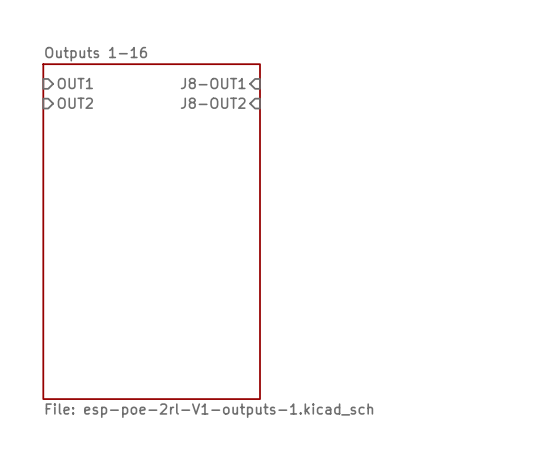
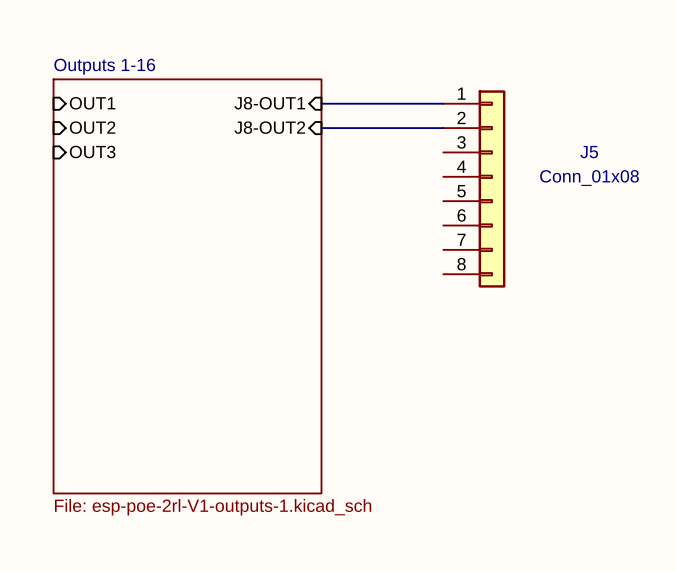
wire: none -> (321, 103) (443, 103)
wire: none -> (321, 128) (443, 128)
sheet pin: none -> OUT3 (92, 151)
J5: none -> Conn_01x08 (474, 188)

